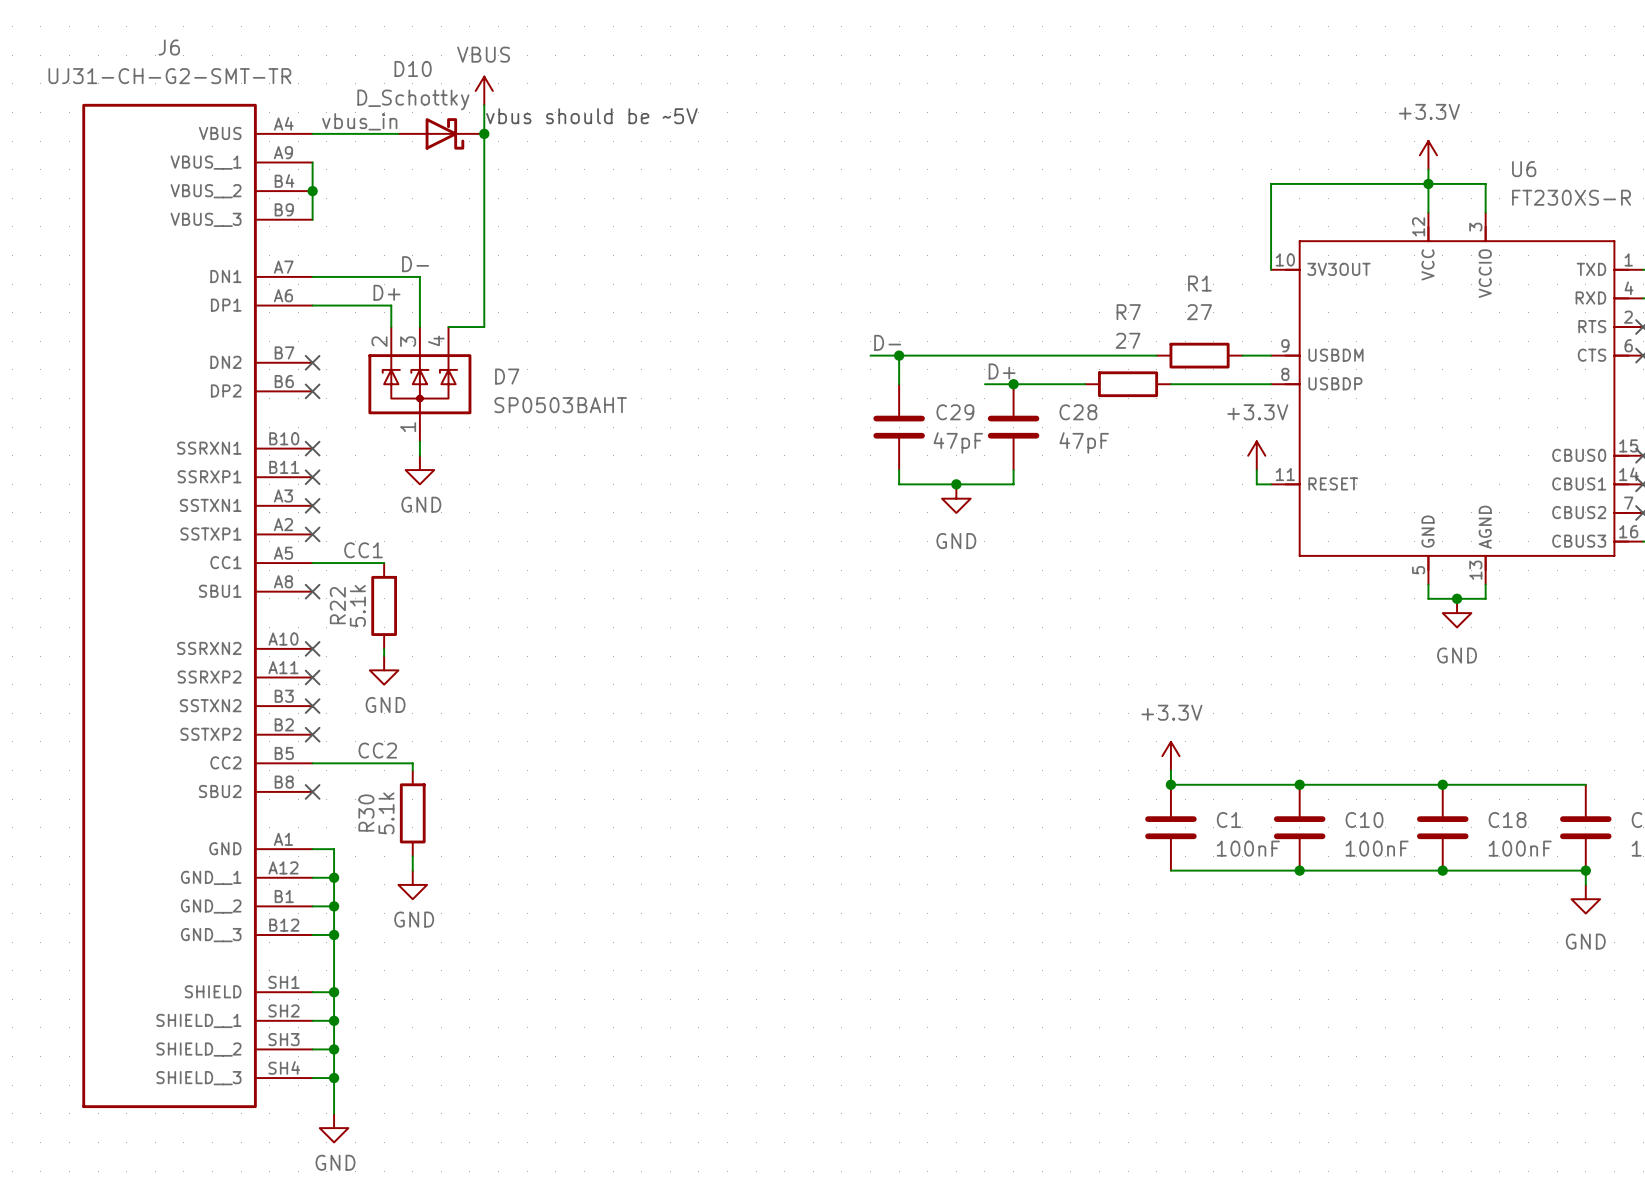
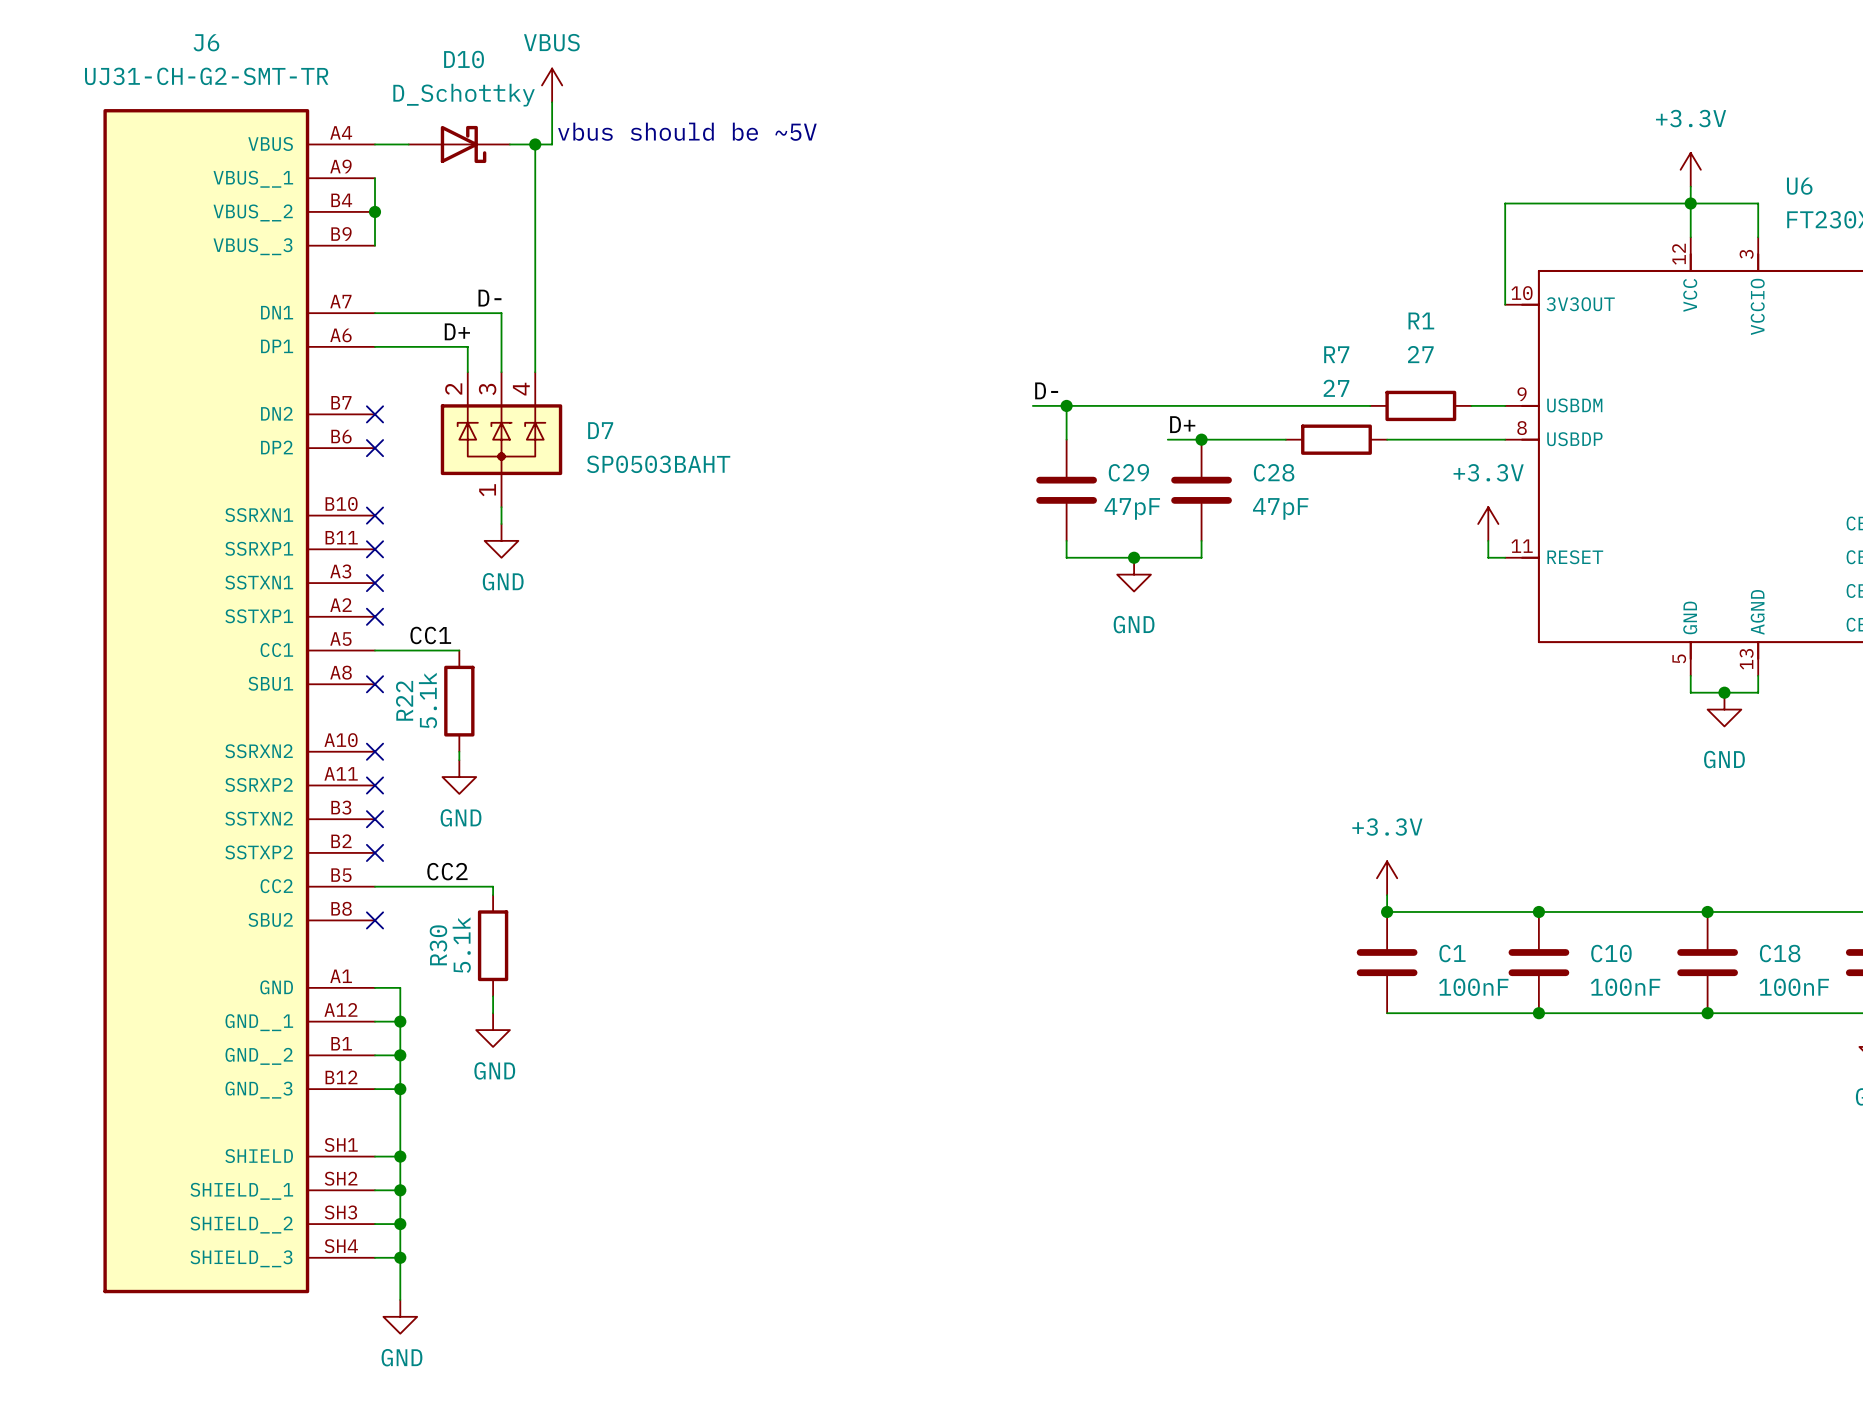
D10 name position: D10 (413, 68) -> D10 (464, 59)
power symbol position: VBUS (484, 90) -> VBUS (552, 85)
wire: none -> (552, 102) (552, 144) (509, 144)
D10 value position: D_Schottky (413, 99) -> D_Schottky (464, 95)
wire: (484, 105) (484, 327) (448, 327) -> (535, 144) (535, 372)
text position: vbus should be ~5V (591, 116) -> vbus should be ~5V (687, 131)
label: vbus_in (359, 121) -> none
D10 position: (441, 133) -> (459, 144)
junction position: (484, 133) -> (535, 144)

